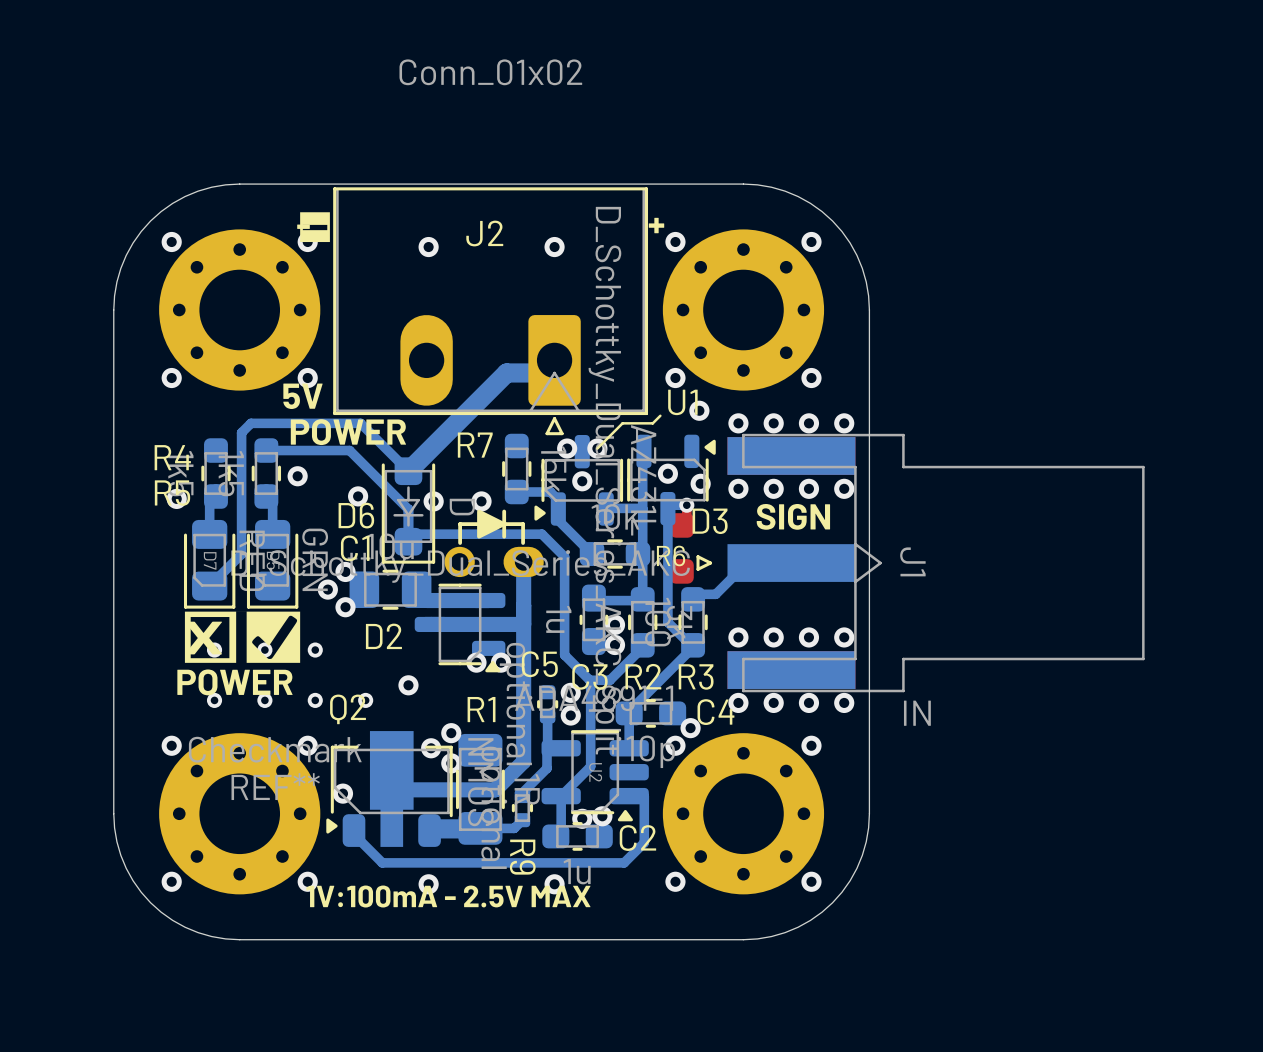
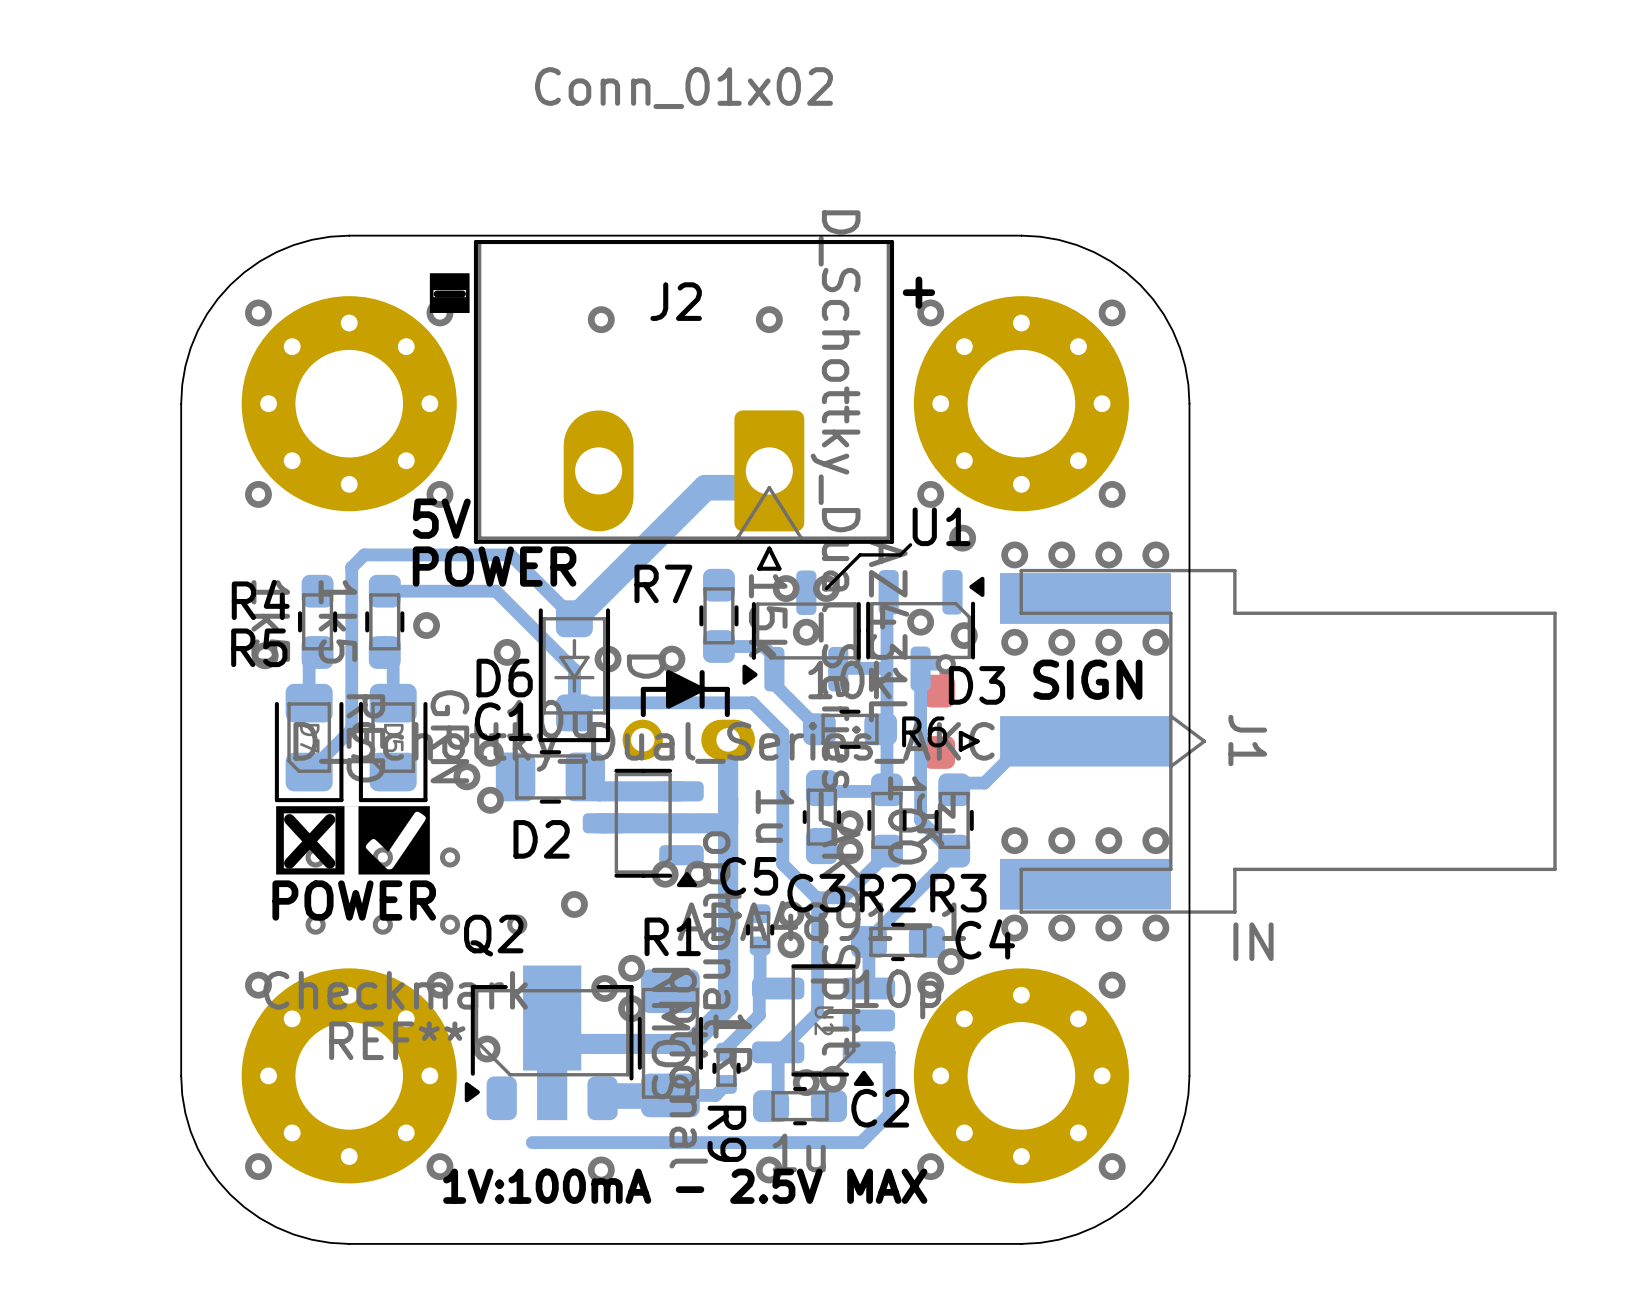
bottom track: (353, 833) (382, 862) (624, 862) -> (532, 1142) (862, 1141)

